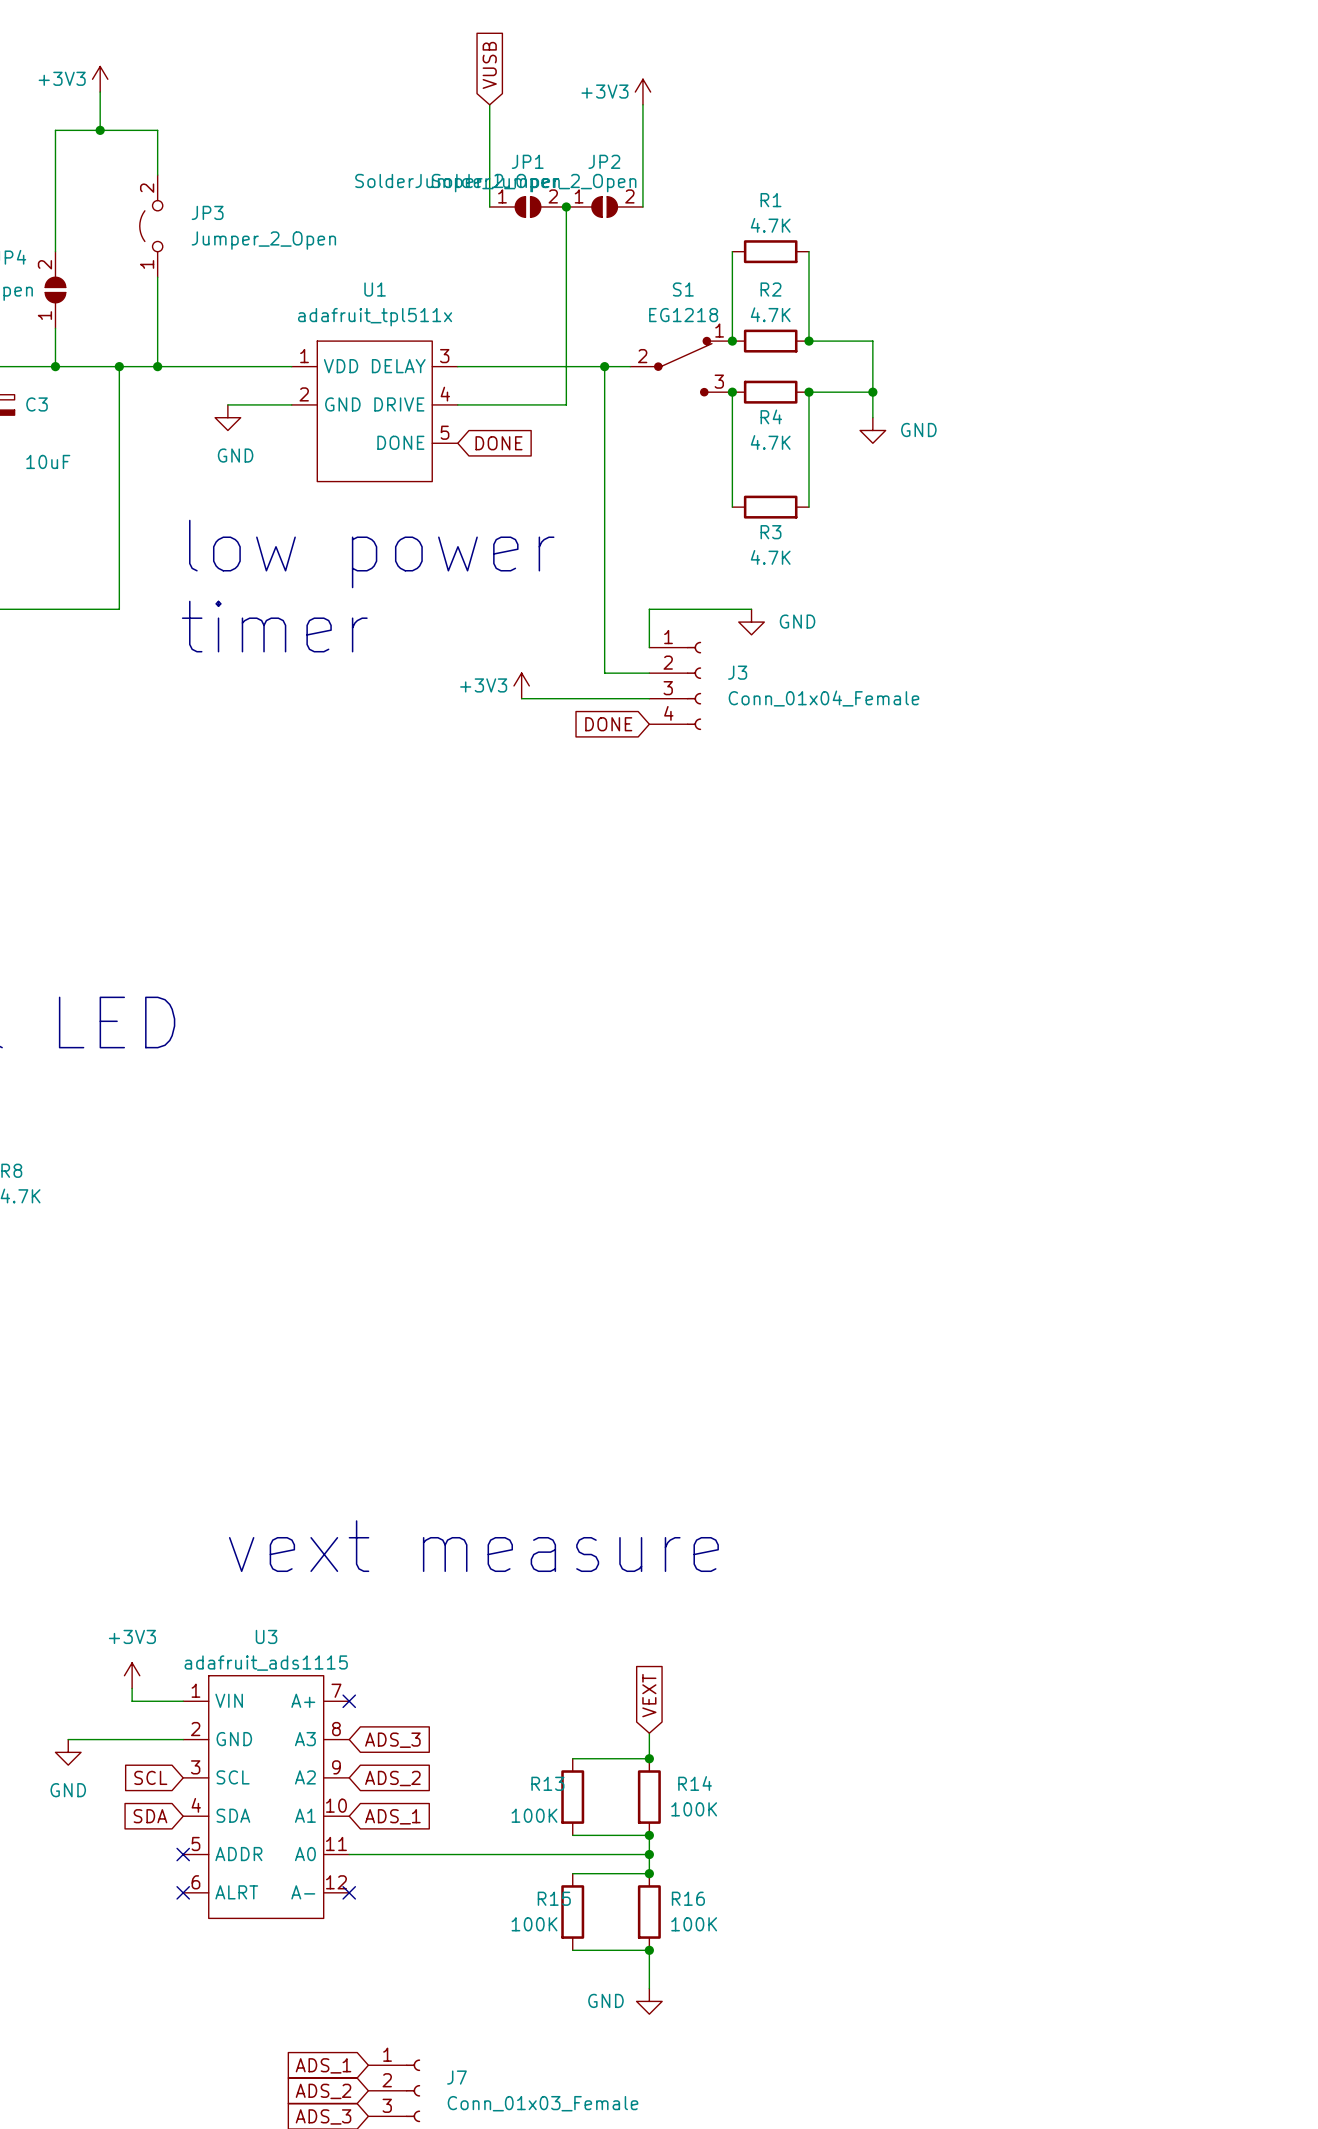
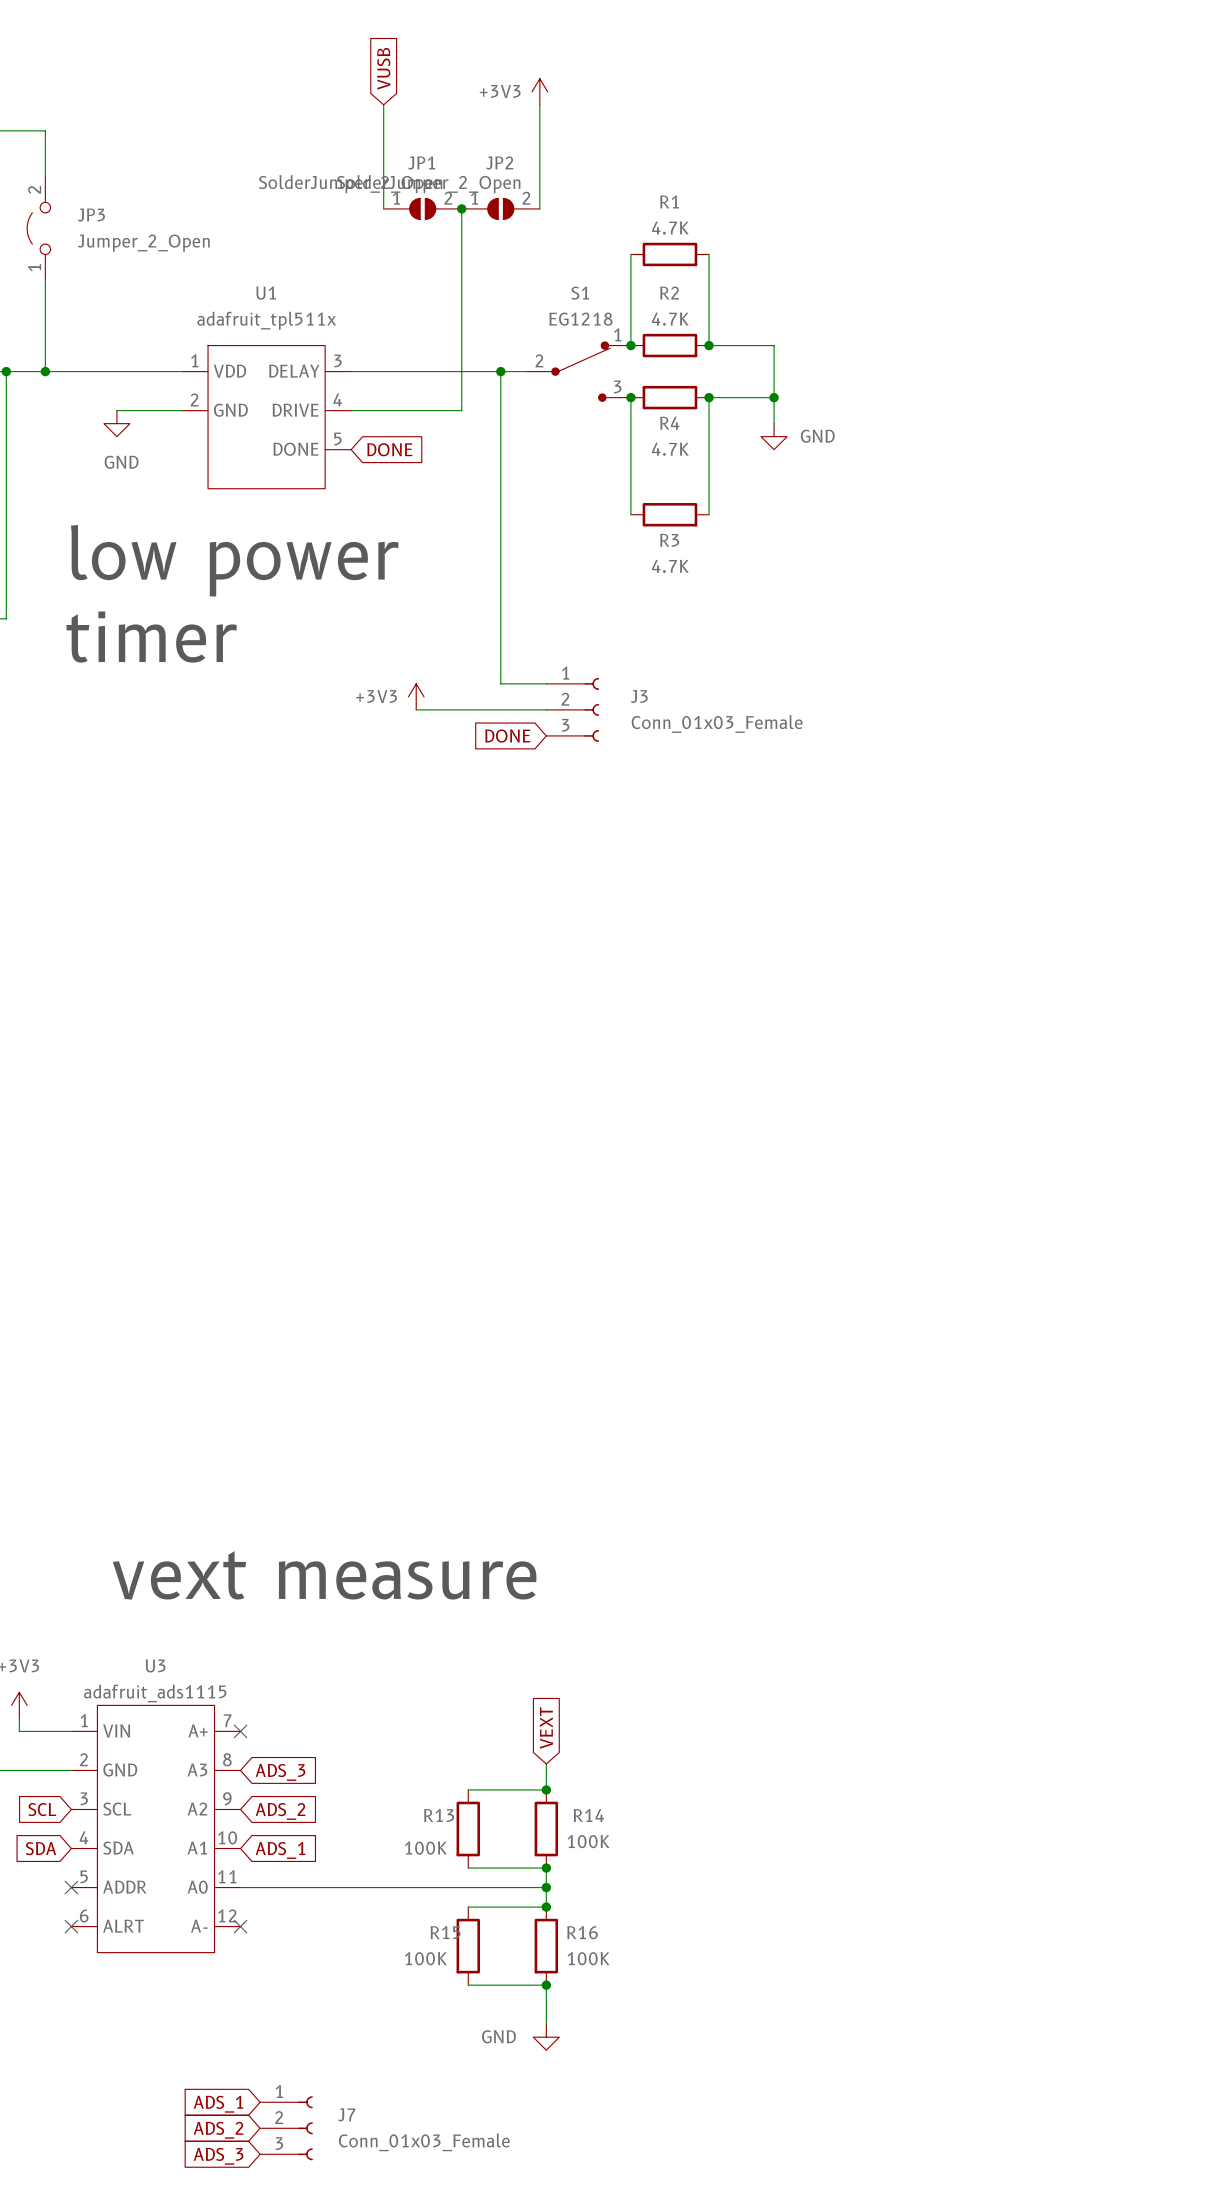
wire: (751, 609) (649, 609) (649, 647) -> none
power symbol: GND (751, 622) -> none
J3 symbol: [649, 641, 702, 731] -> [546, 677, 600, 742]
J3 value: Conn_01x04_Female (824, 698) -> Conn_01x03_Female (717, 723)

